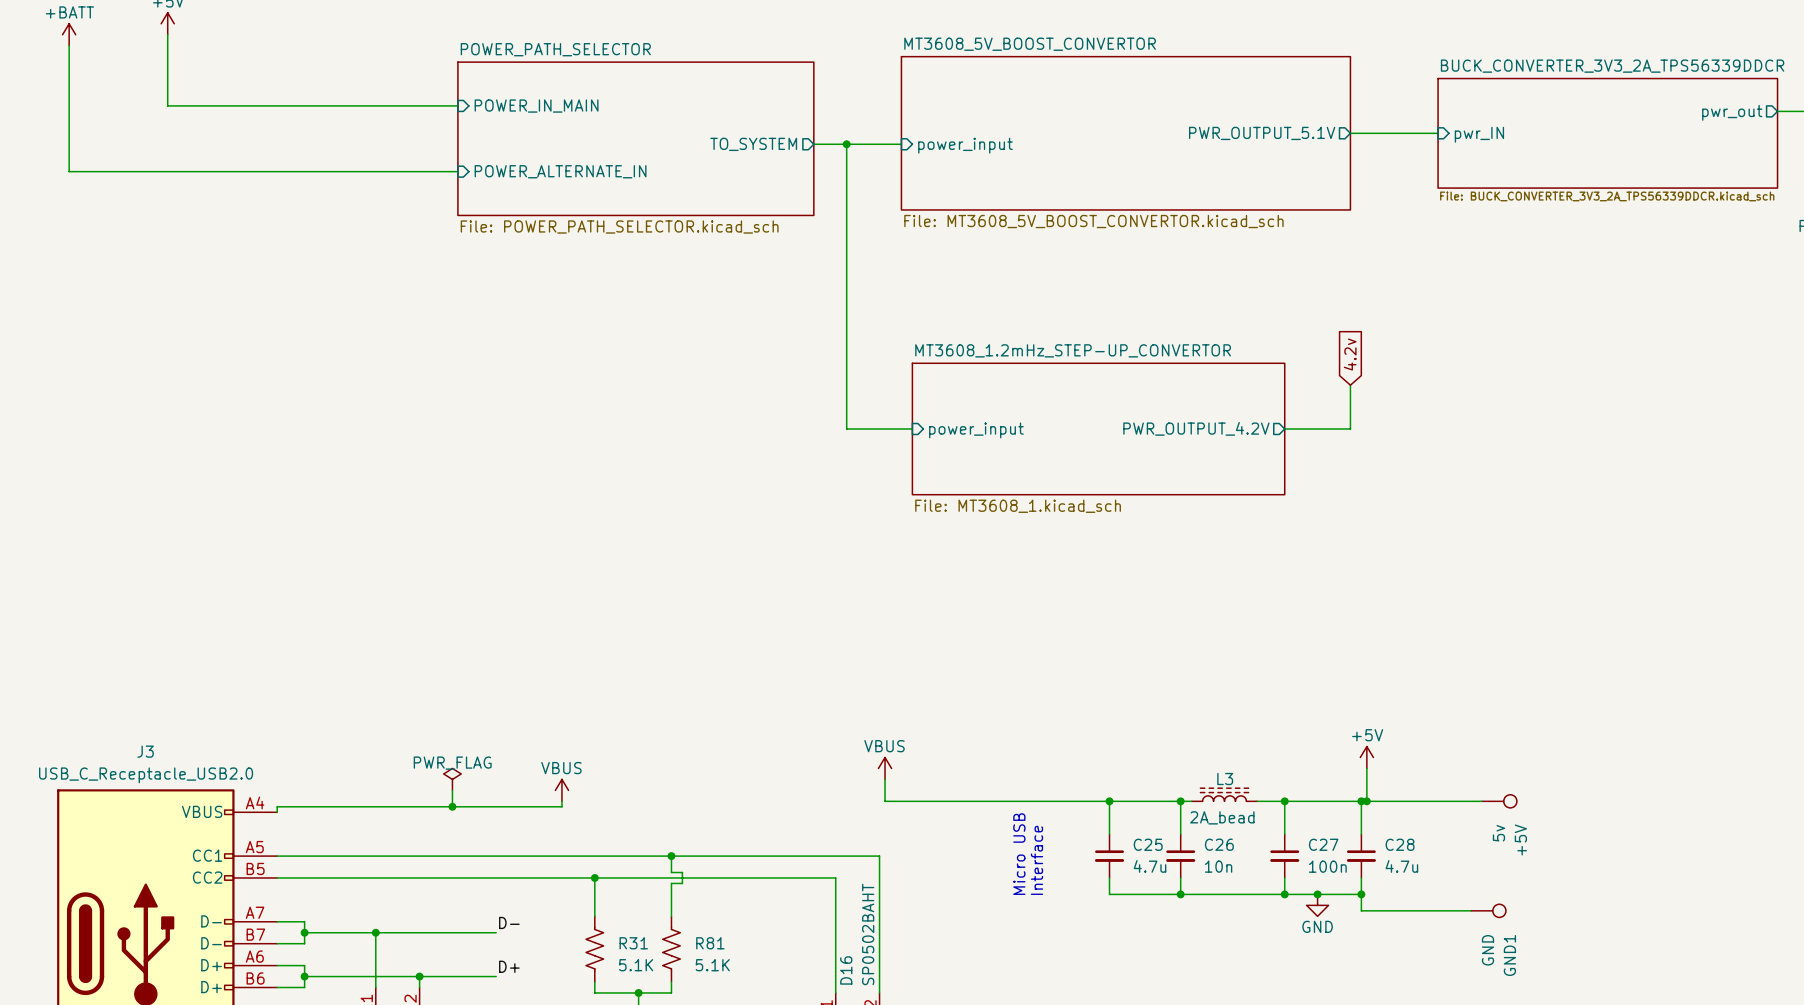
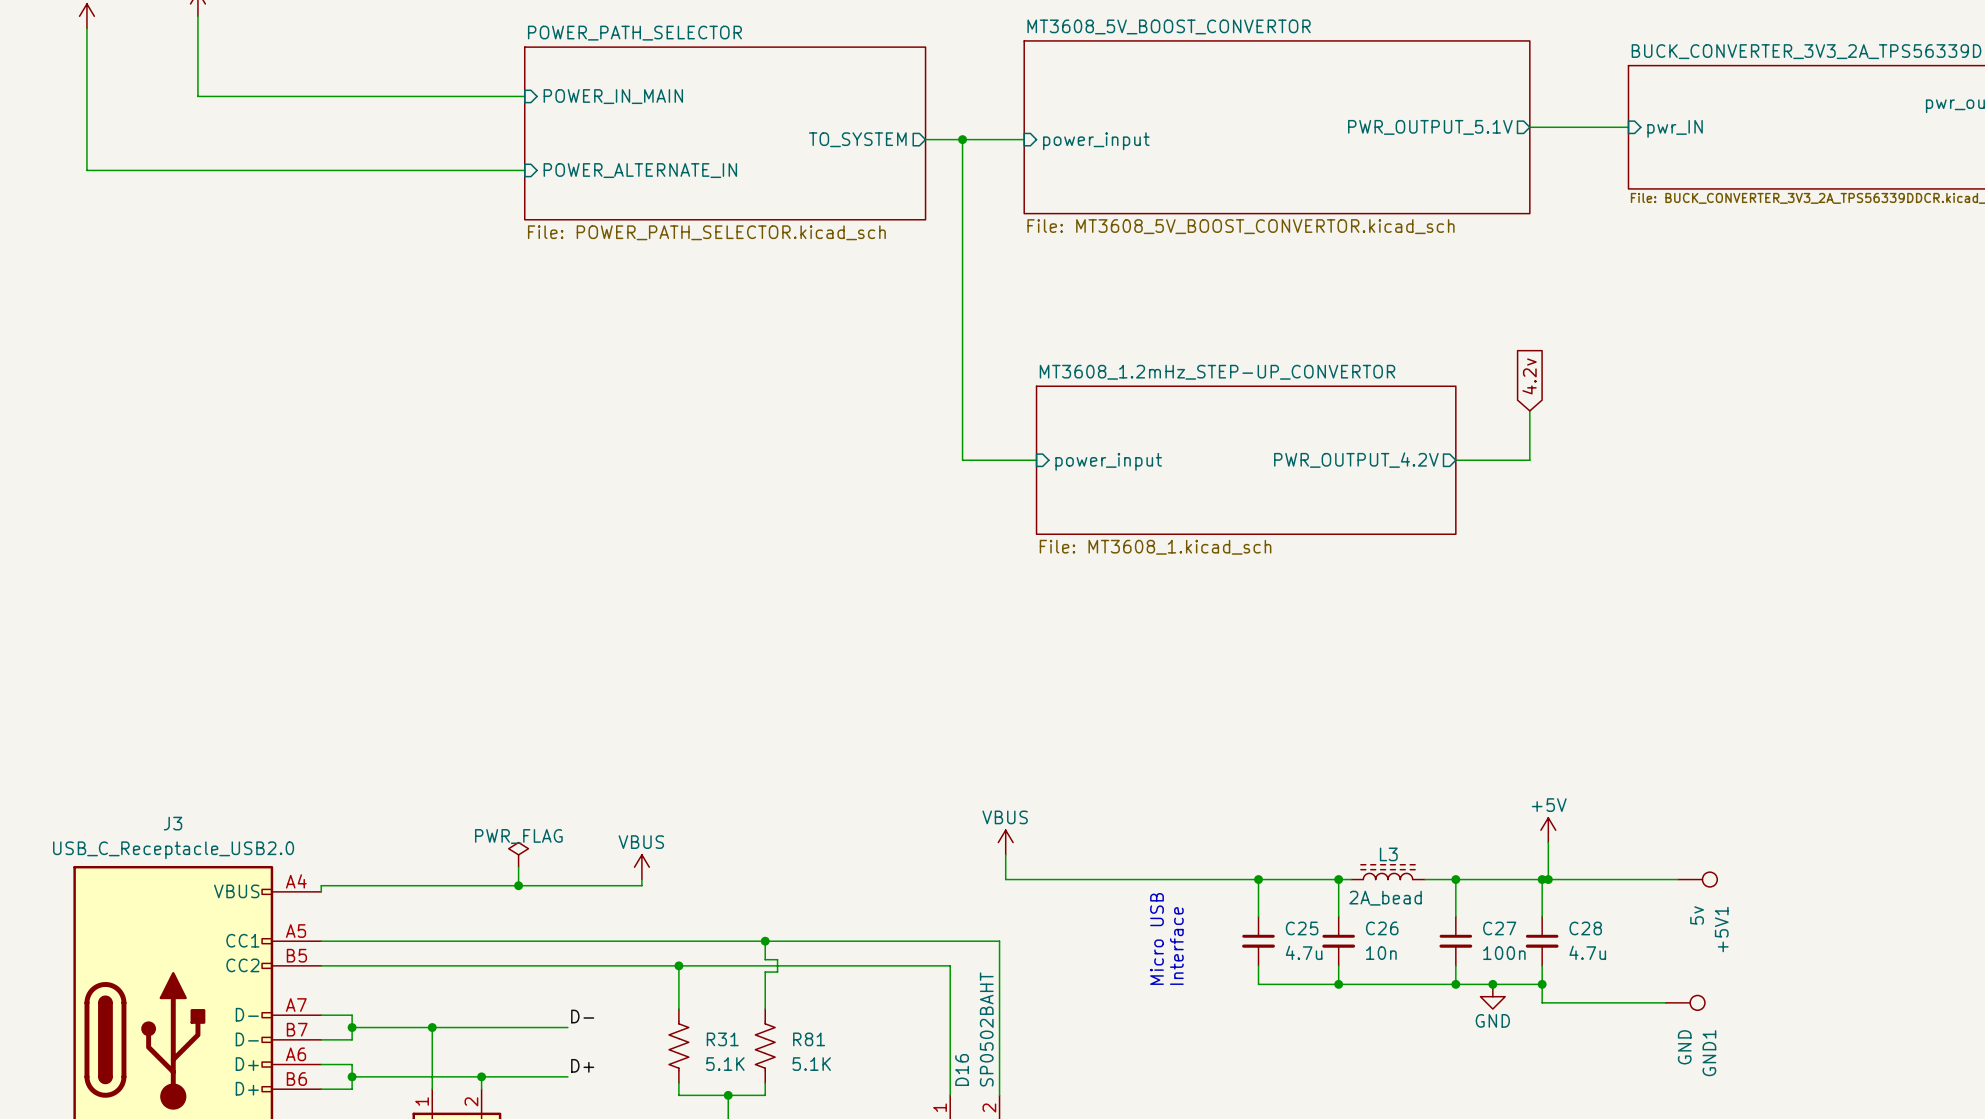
+5V name: +5V (1520, 840) -> +5V1 (1721, 929)

